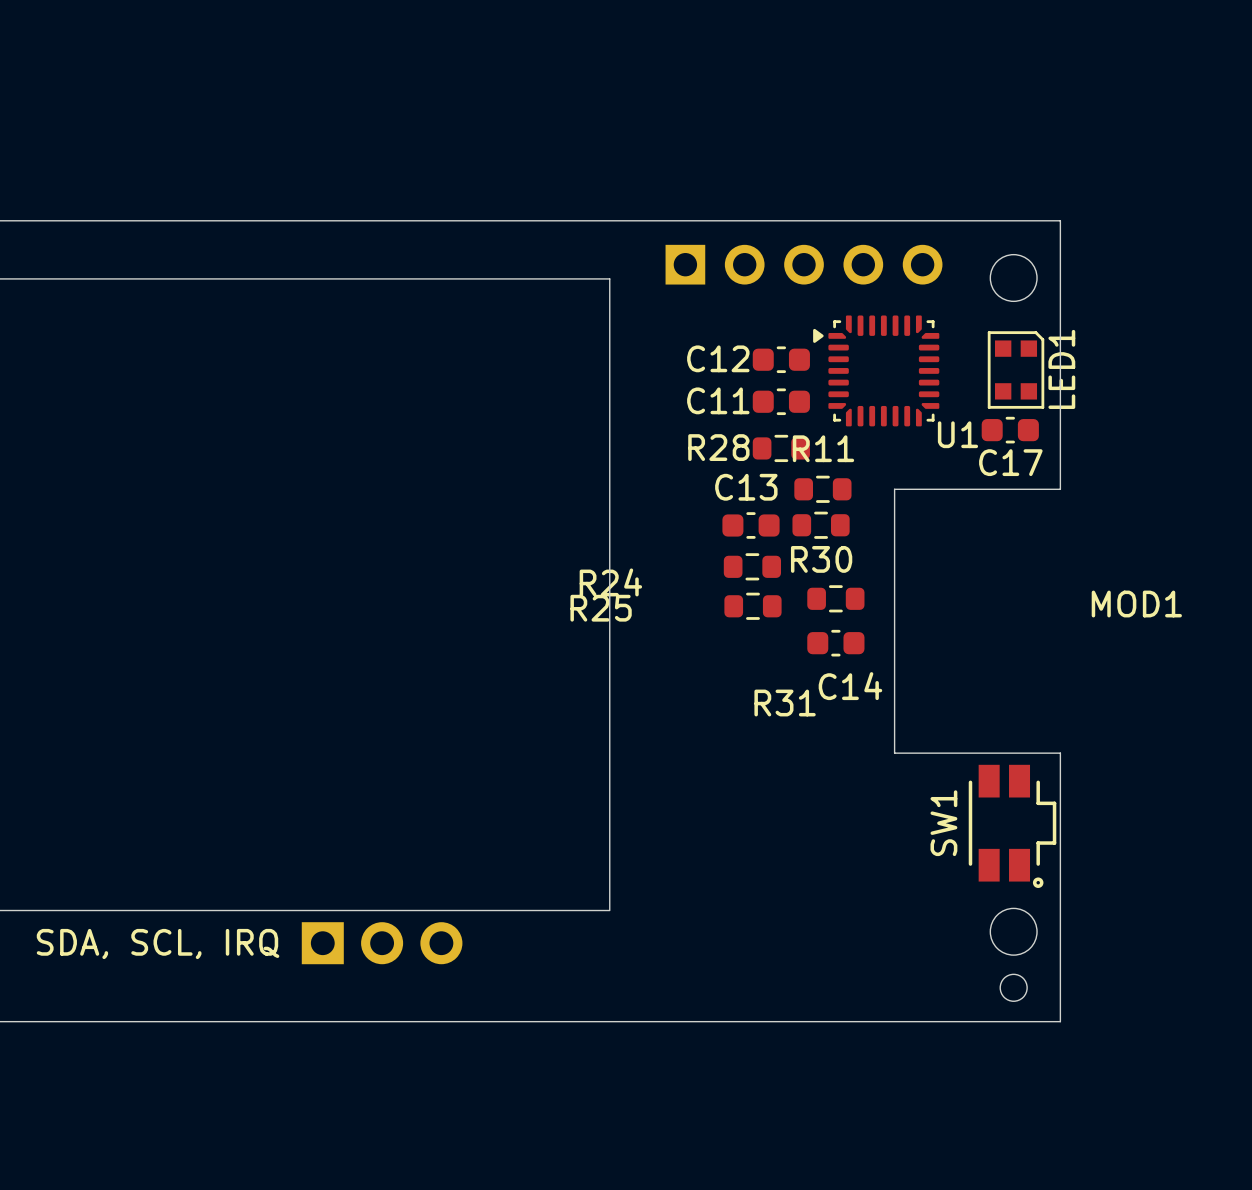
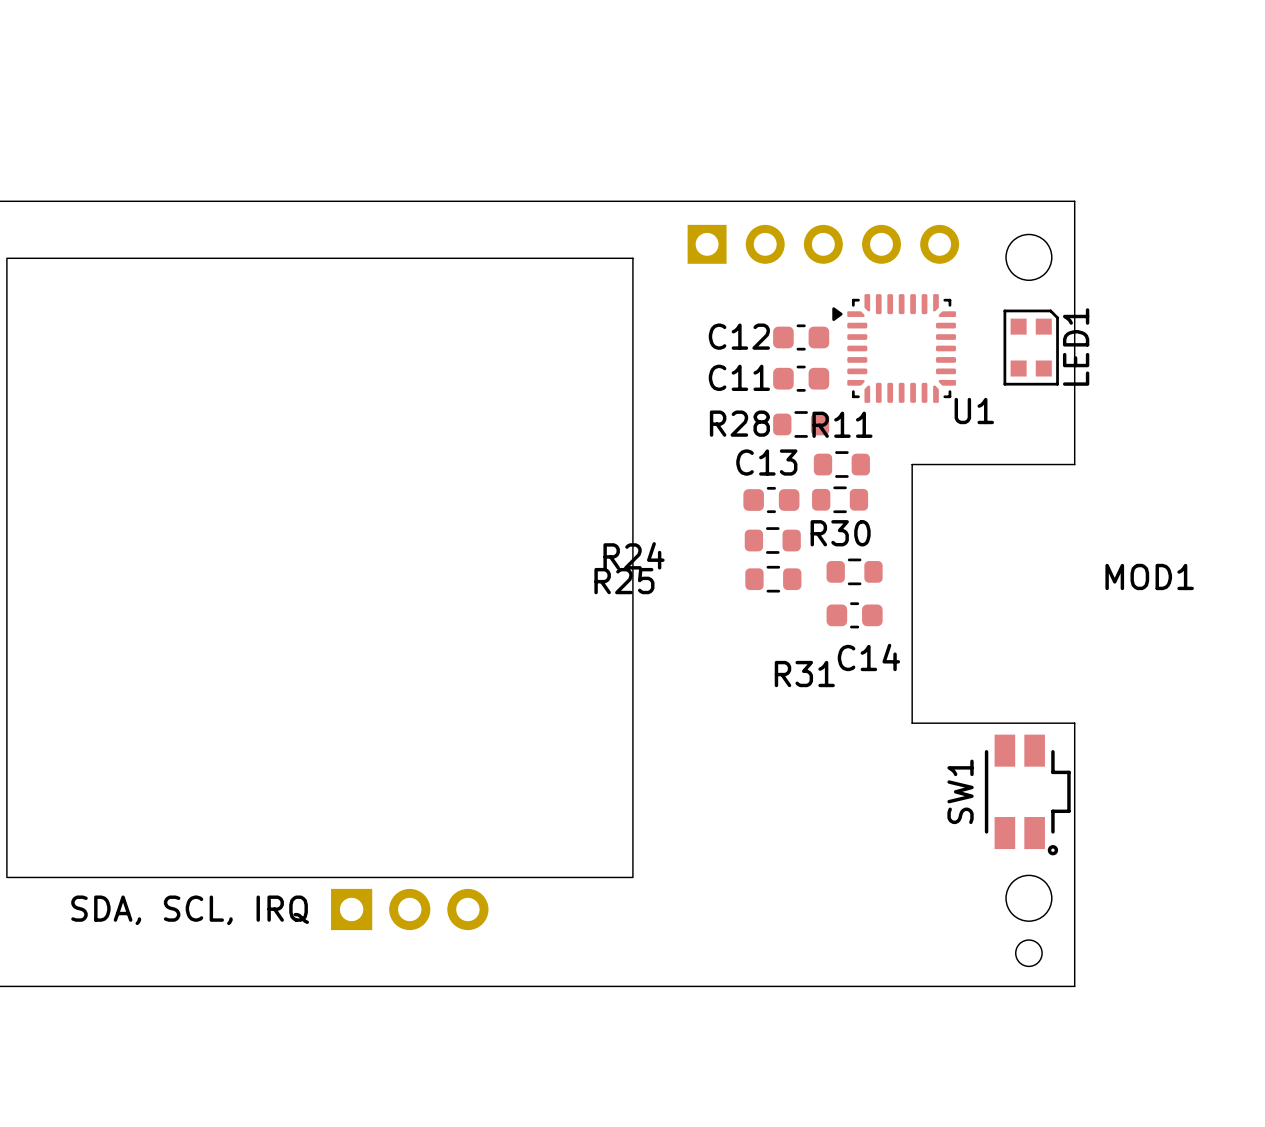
C17: (1010, 430) -> none

